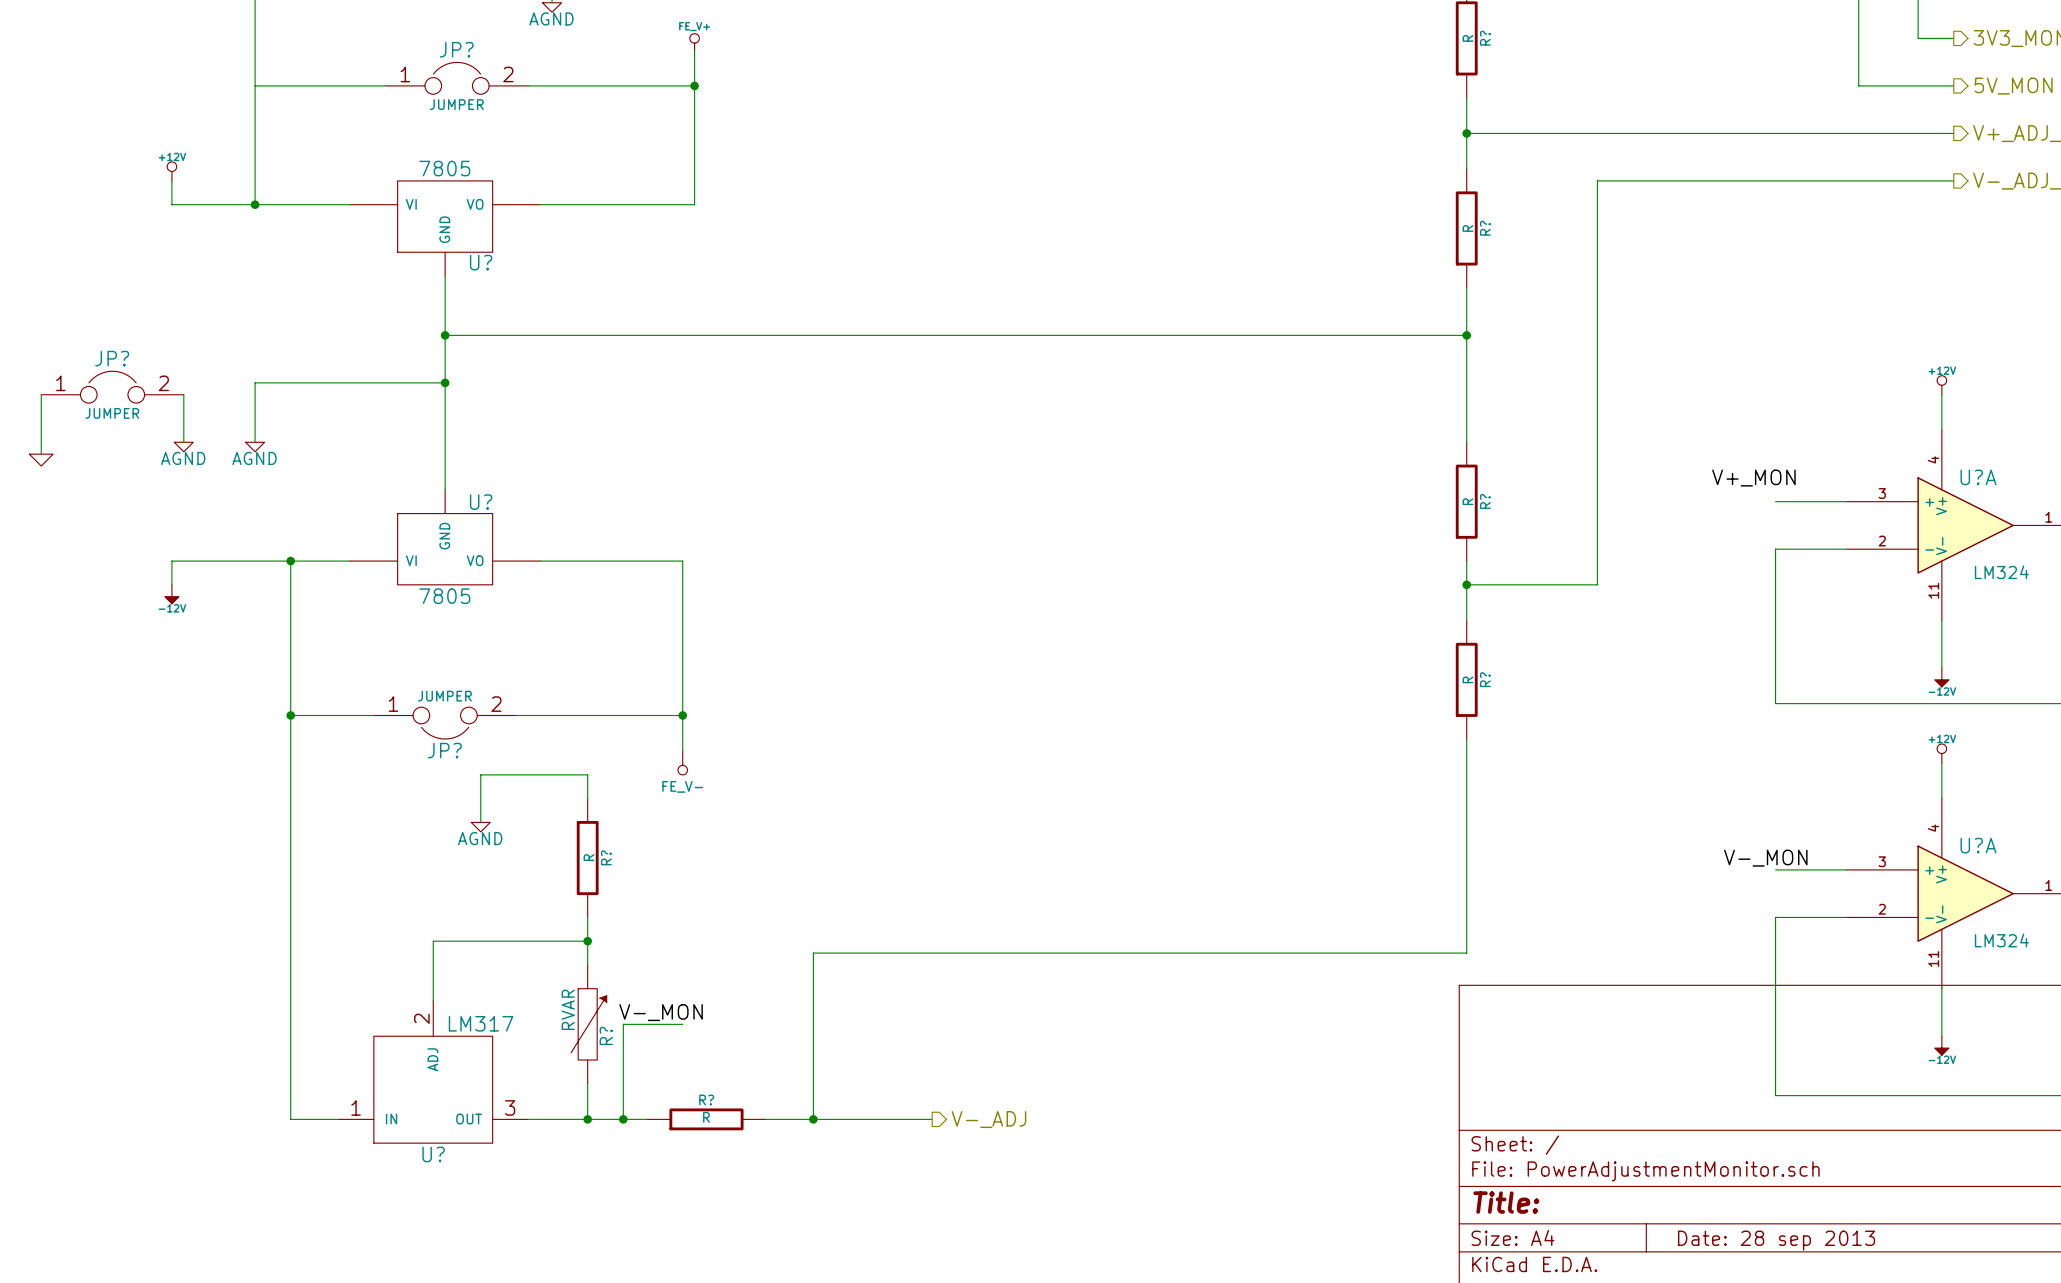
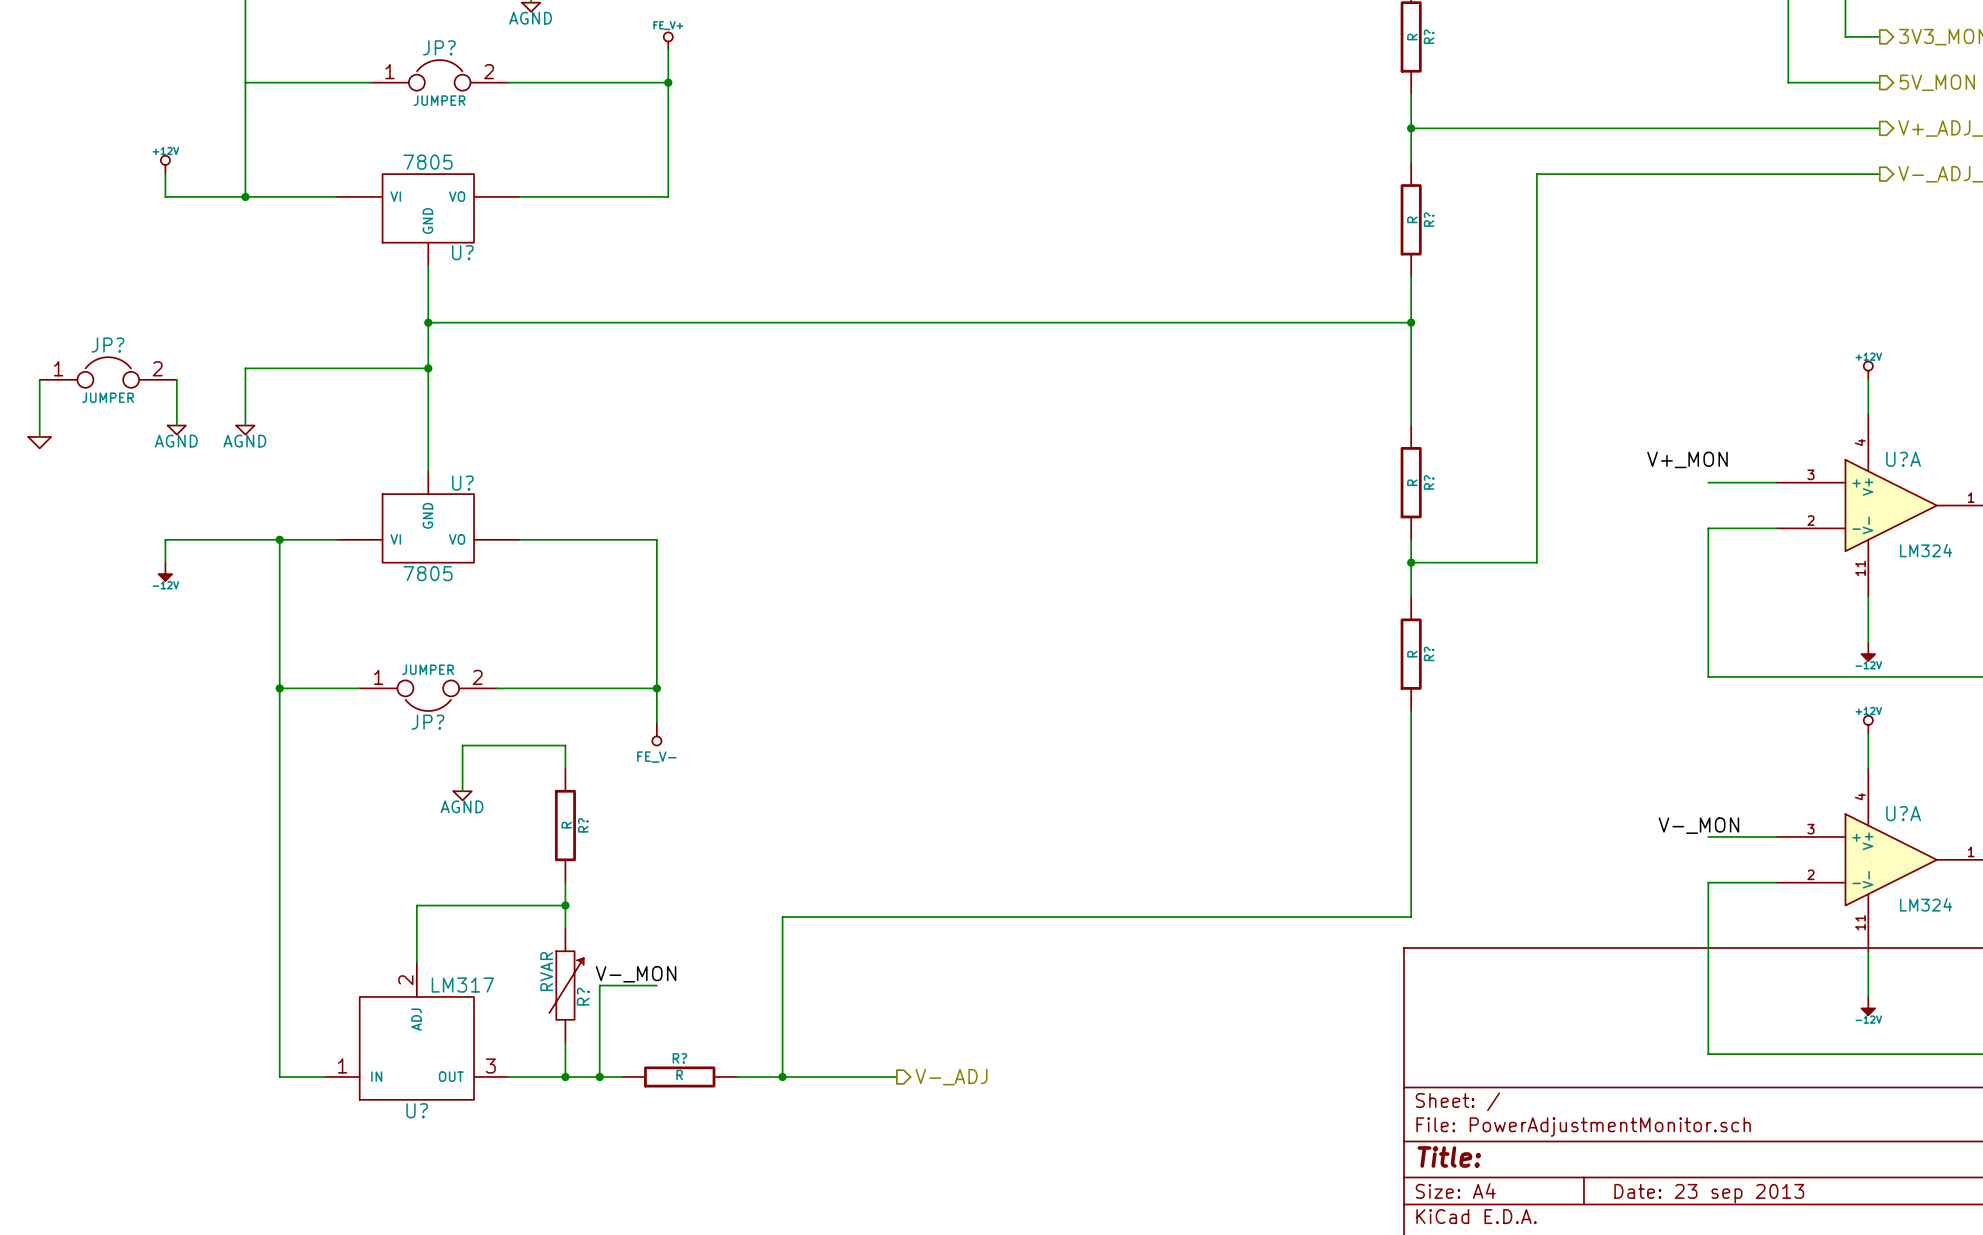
title block: Date: 28 sep 2013 (1776, 1240) -> Date: 23 sep 2013 (1709, 1193)

